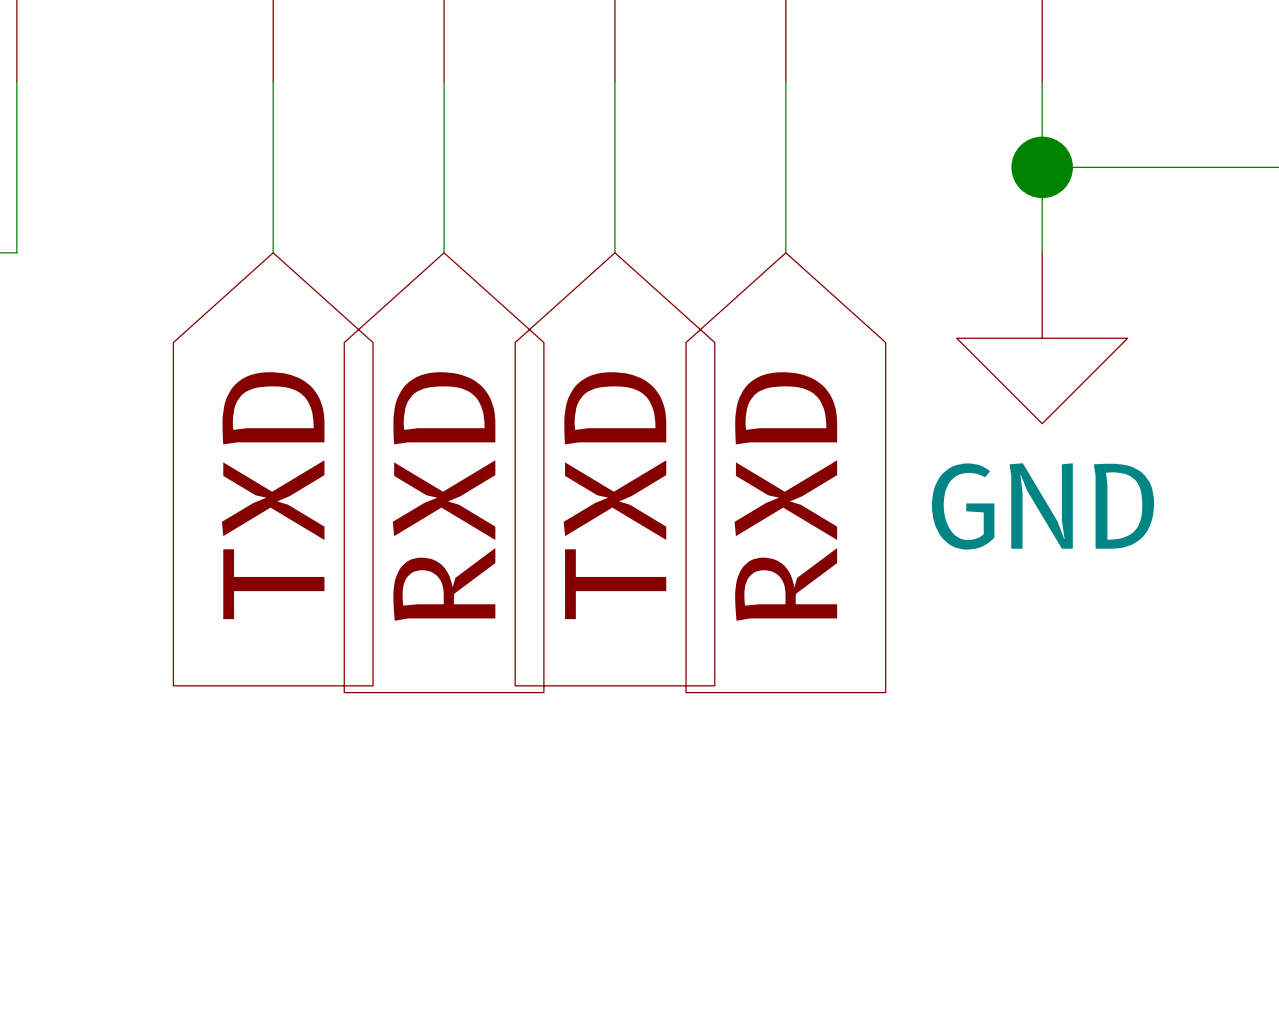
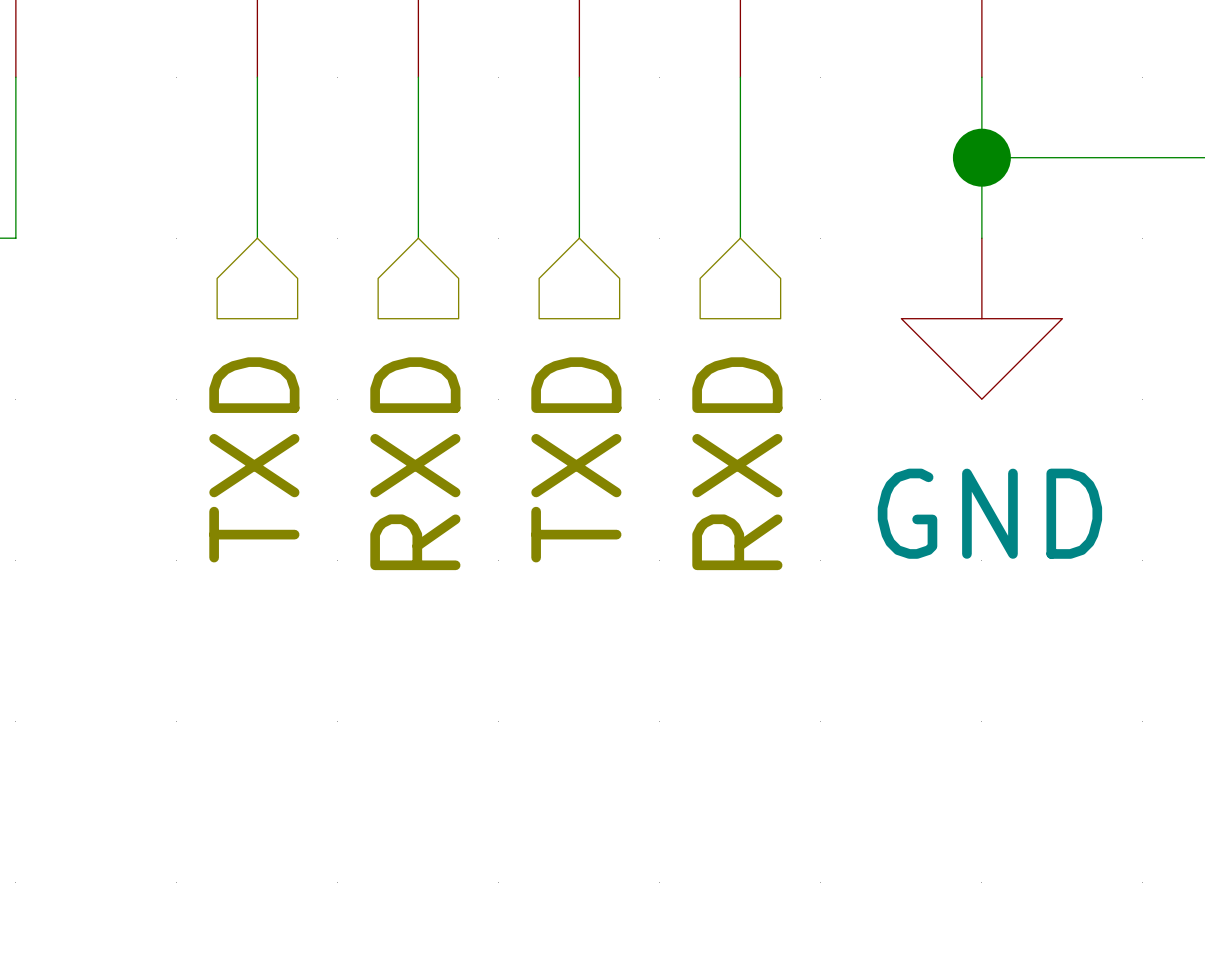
hierarchical label: none -> TXD (254, 459)
hierarchical label: none -> TXD (576, 459)
hierarchical label: none -> RXD (415, 463)
hierarchical label: none -> RXD (737, 463)
global label: TXD (273, 495) -> none
global label: TXD (614, 495) -> none
global label: RXD (444, 496) -> none
global label: RXD (785, 496) -> none
power symbol text position: GND (1042, 506) -> GND (989, 513)

